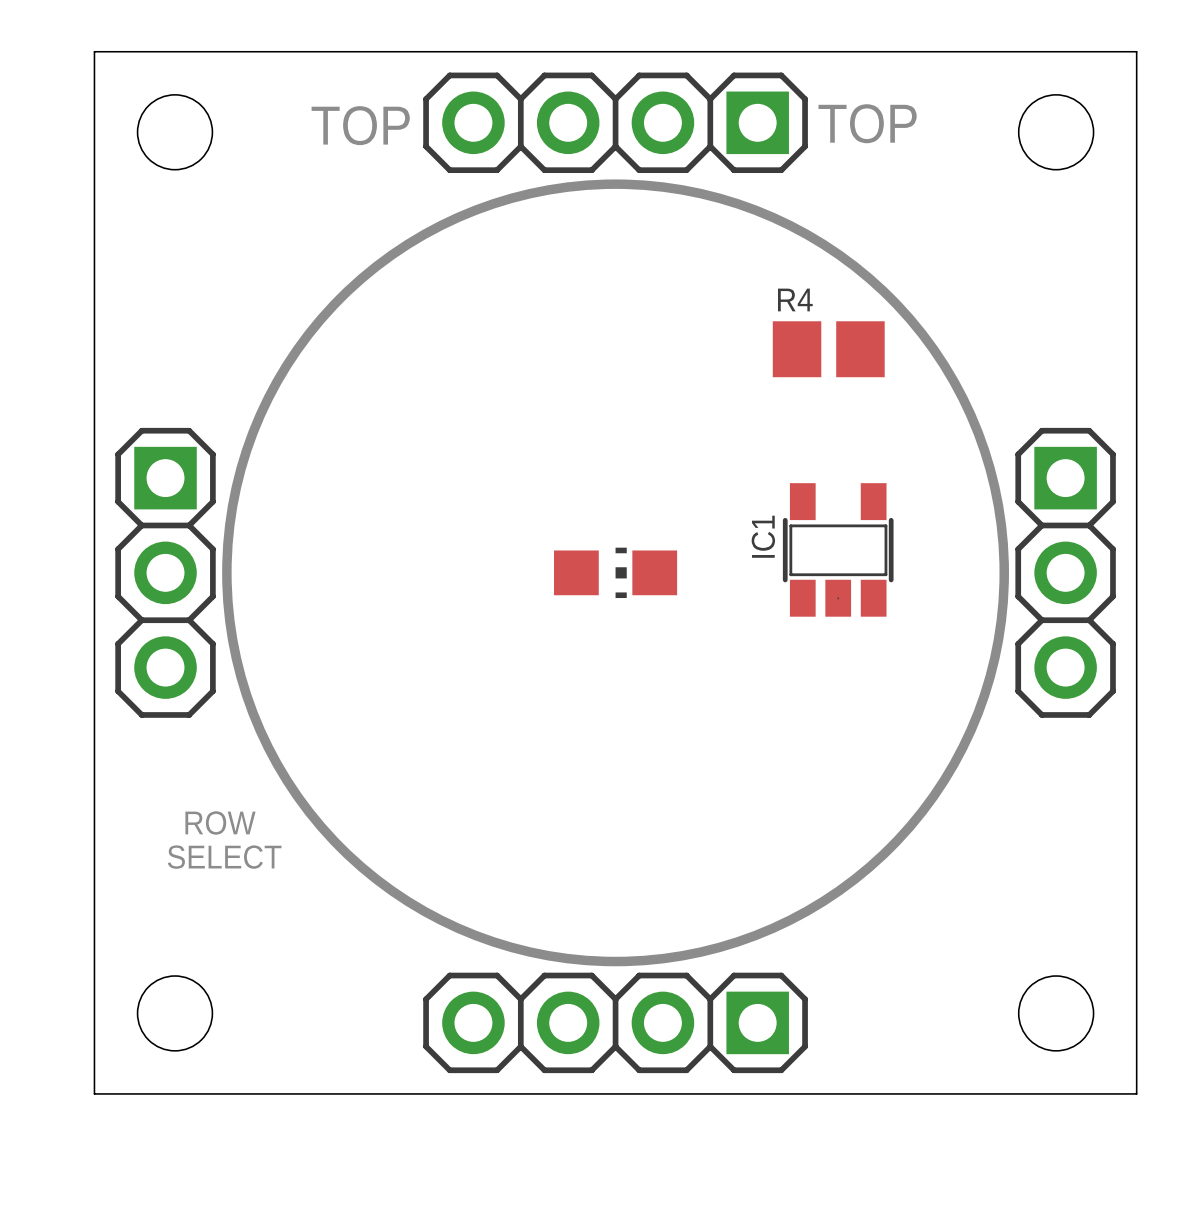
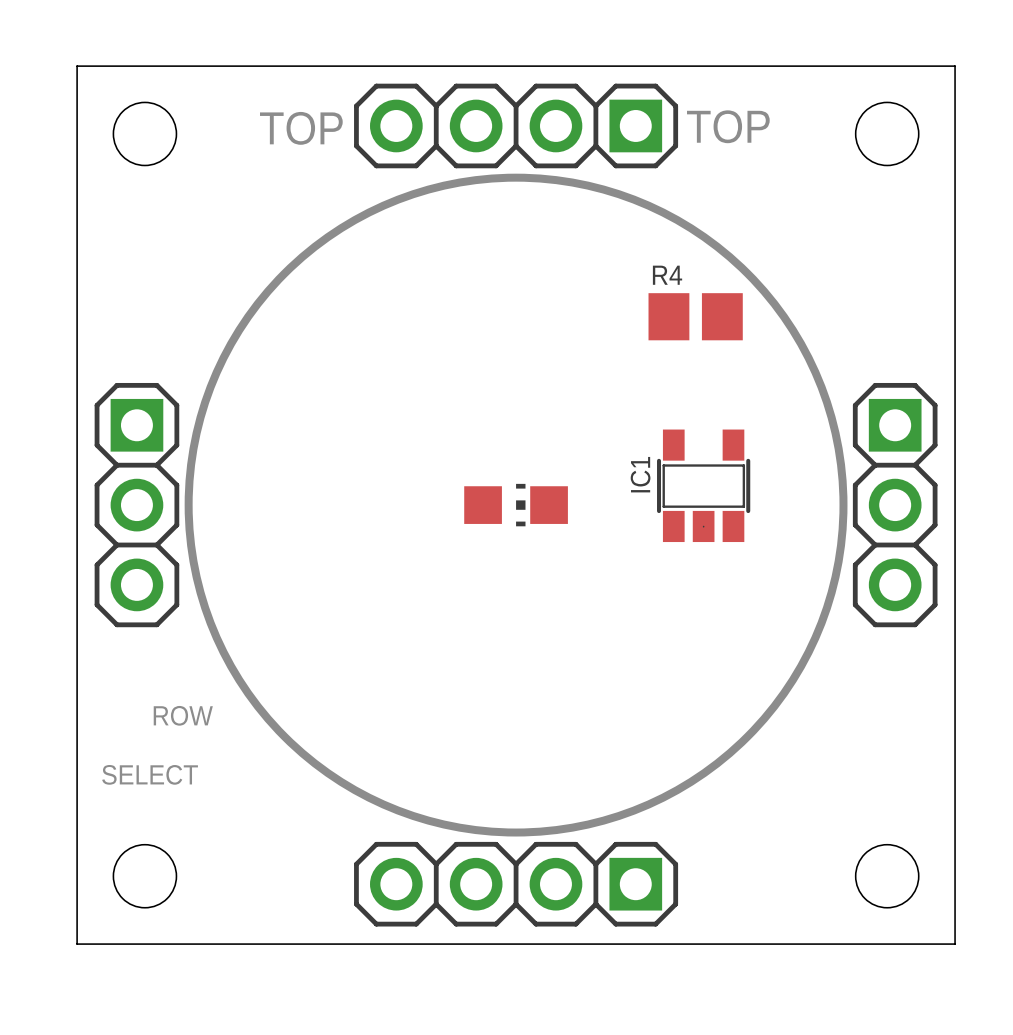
text position: SELECT (224, 857) -> SELECT (150, 774)

